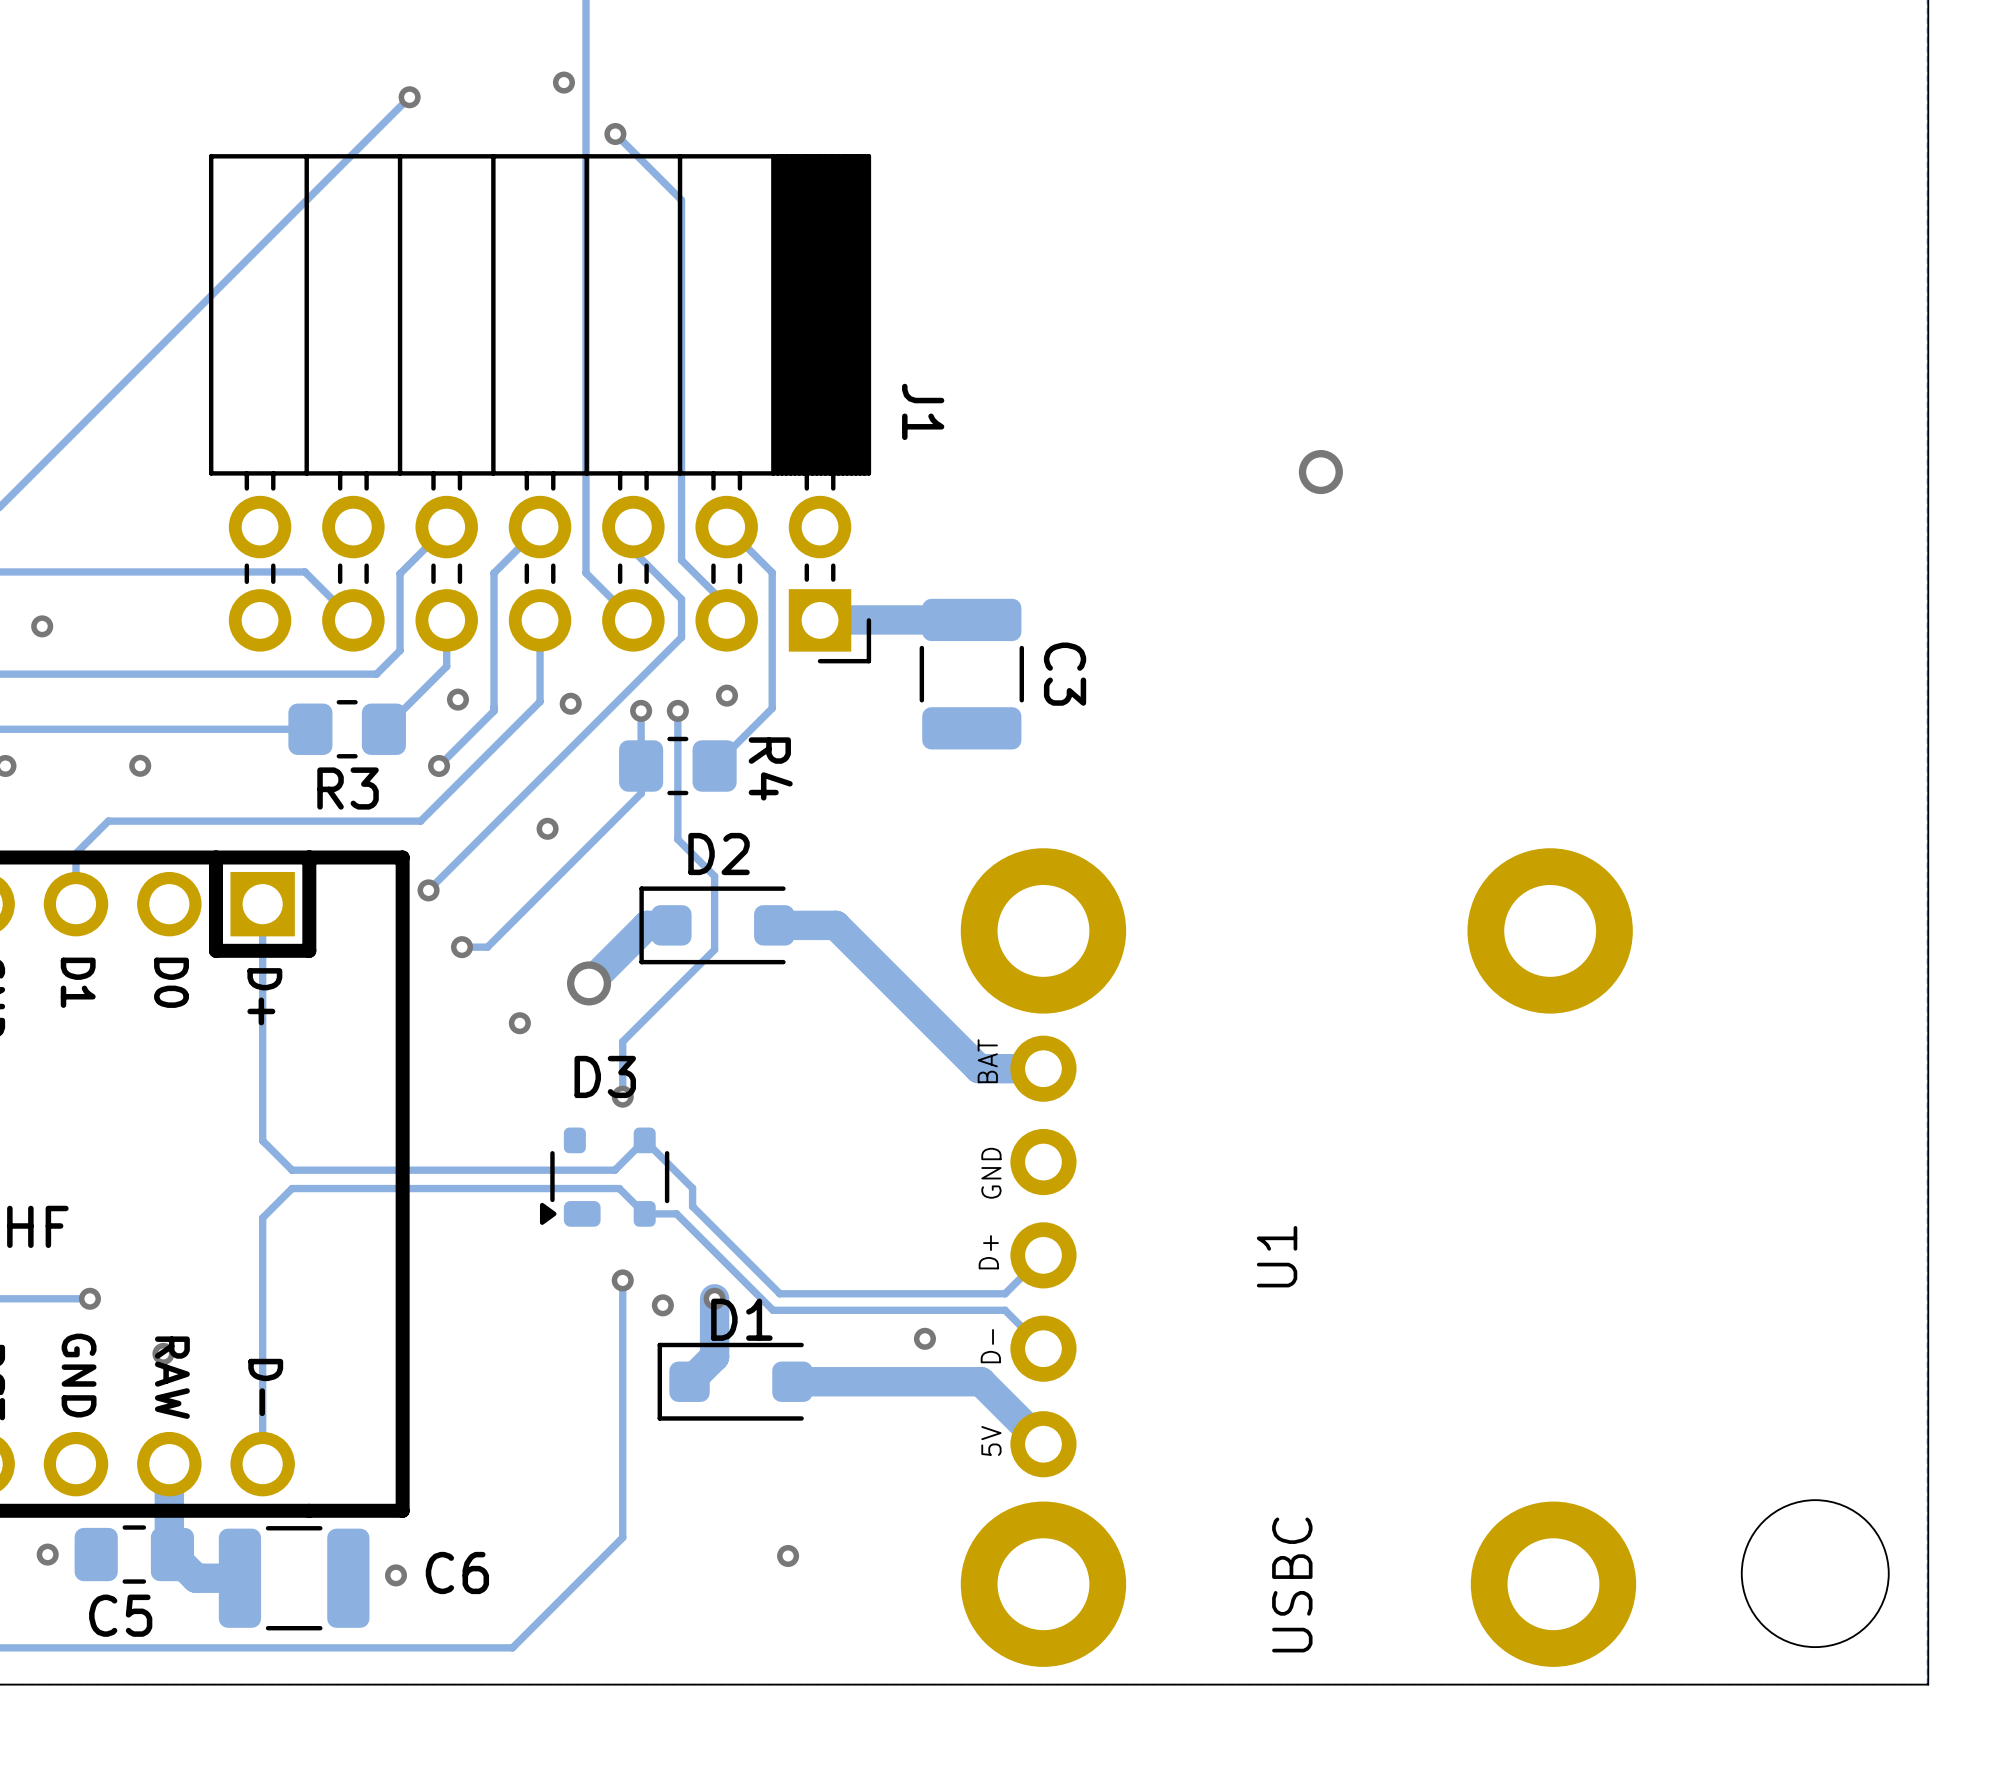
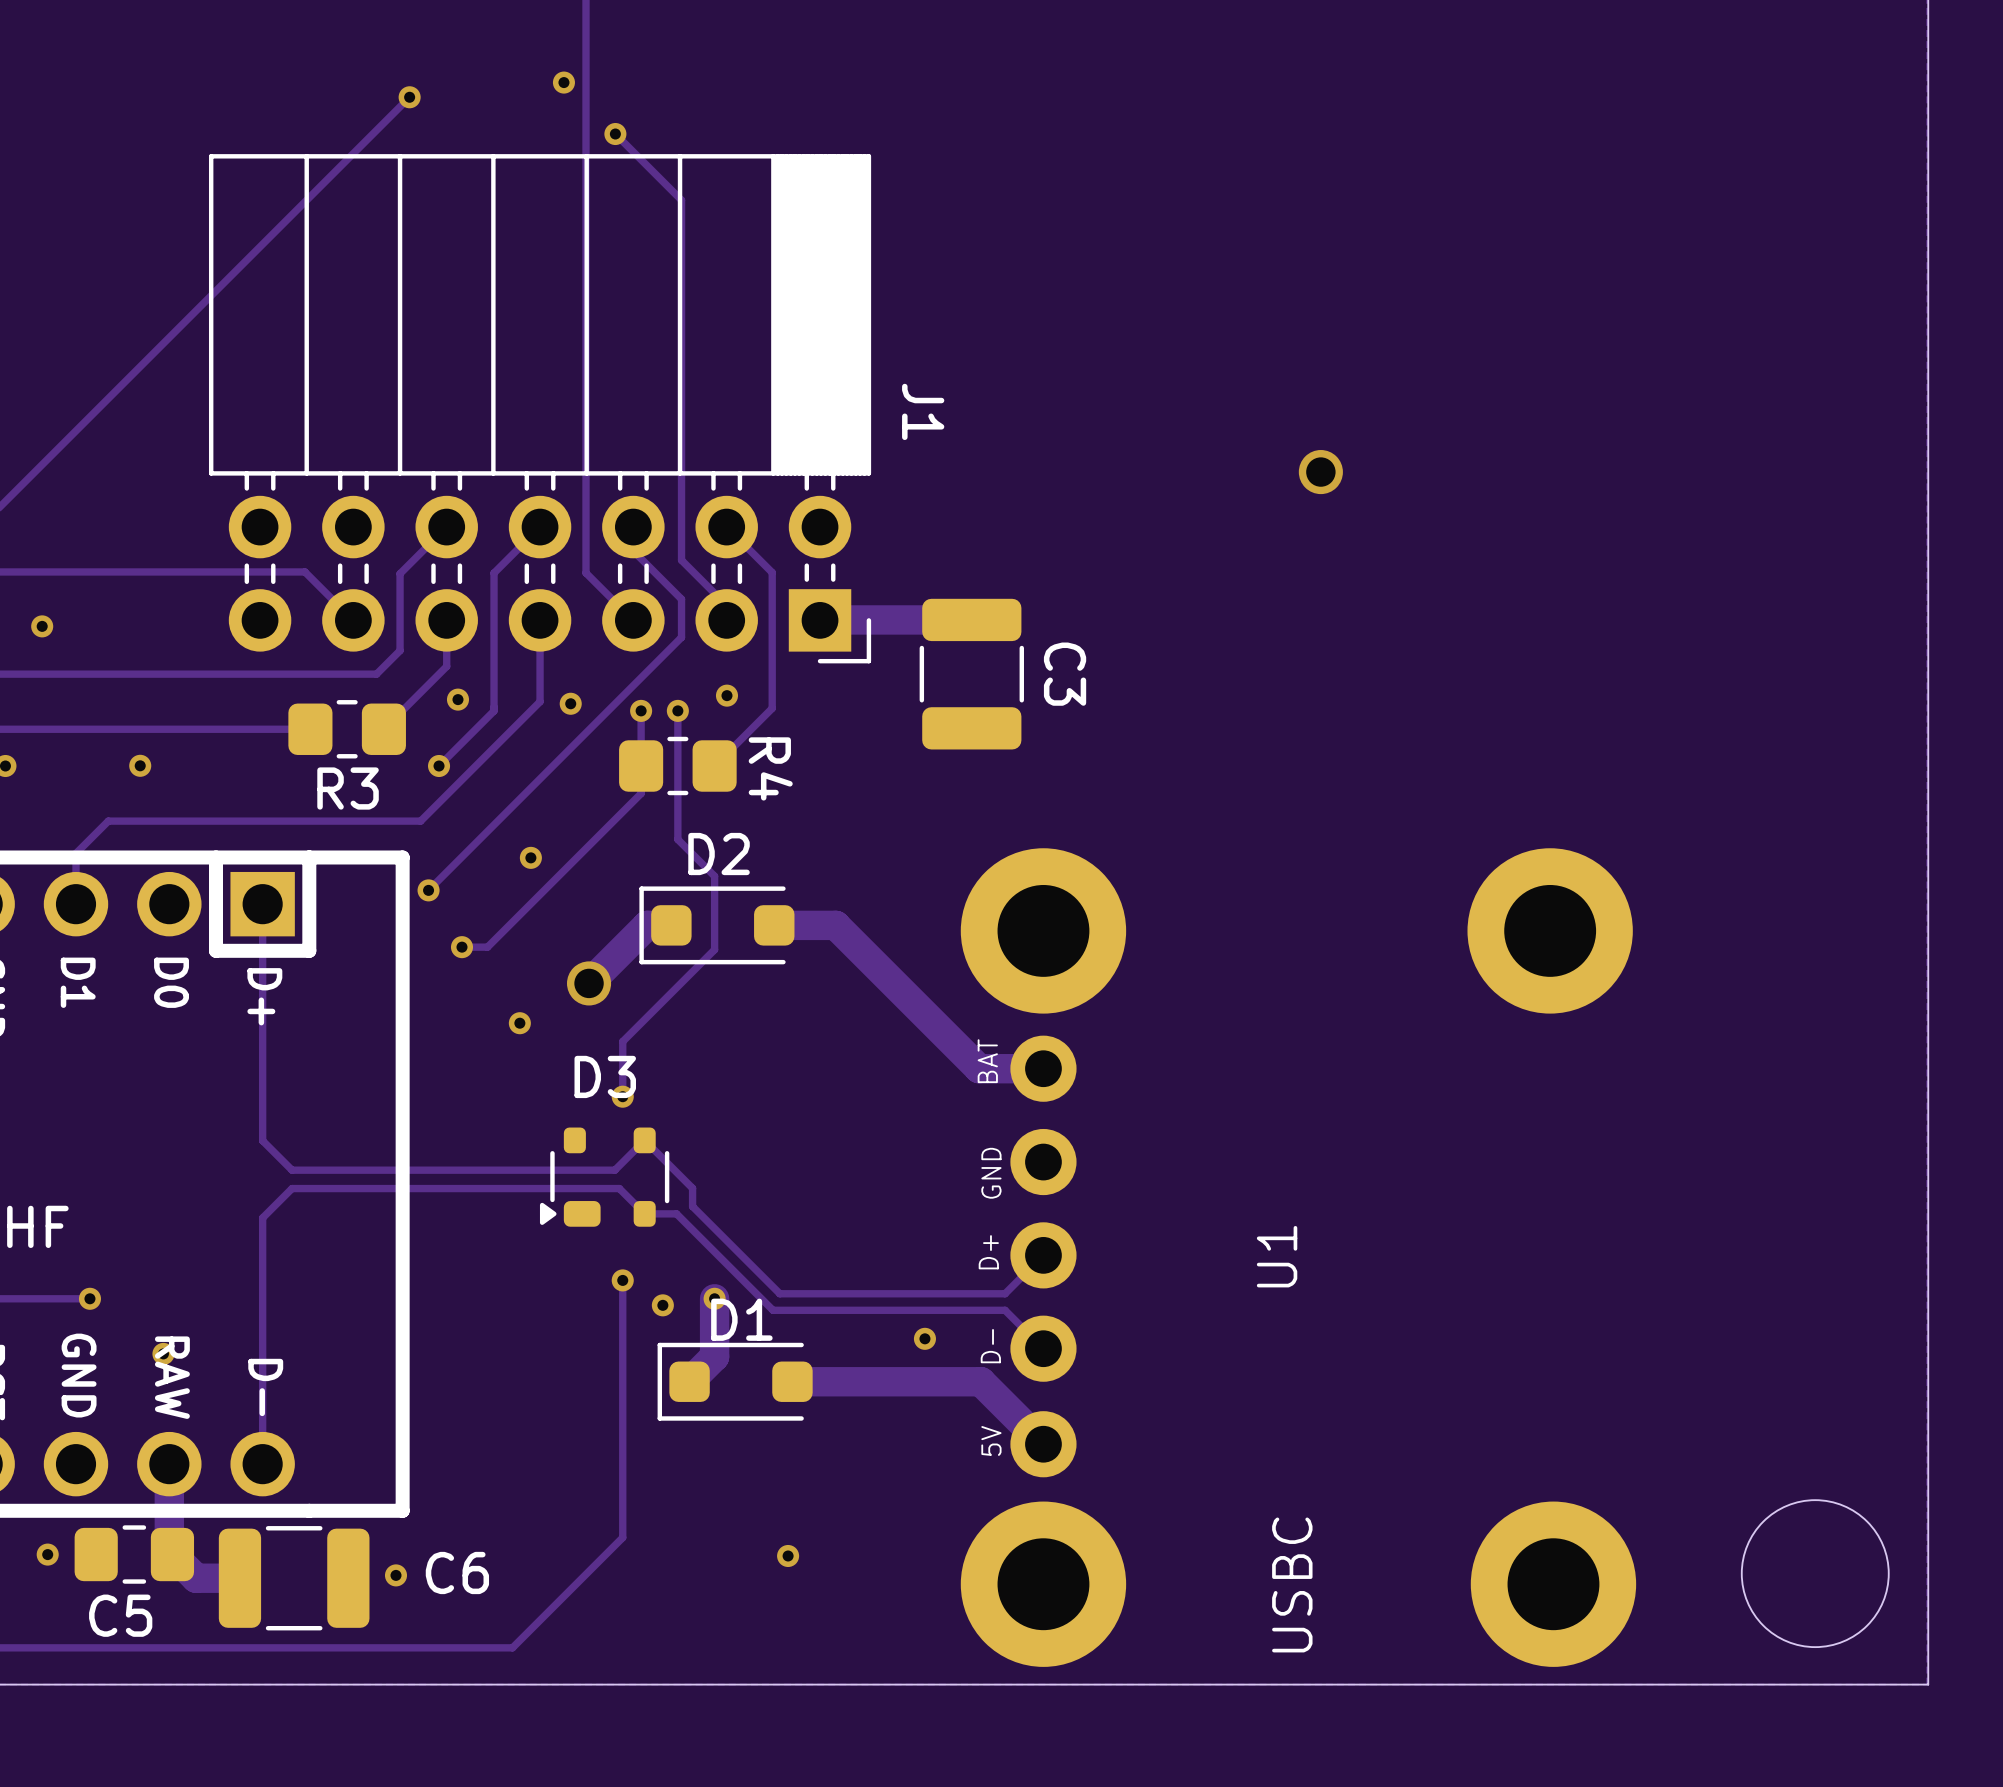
via position: (547, 828) -> (530, 857)

